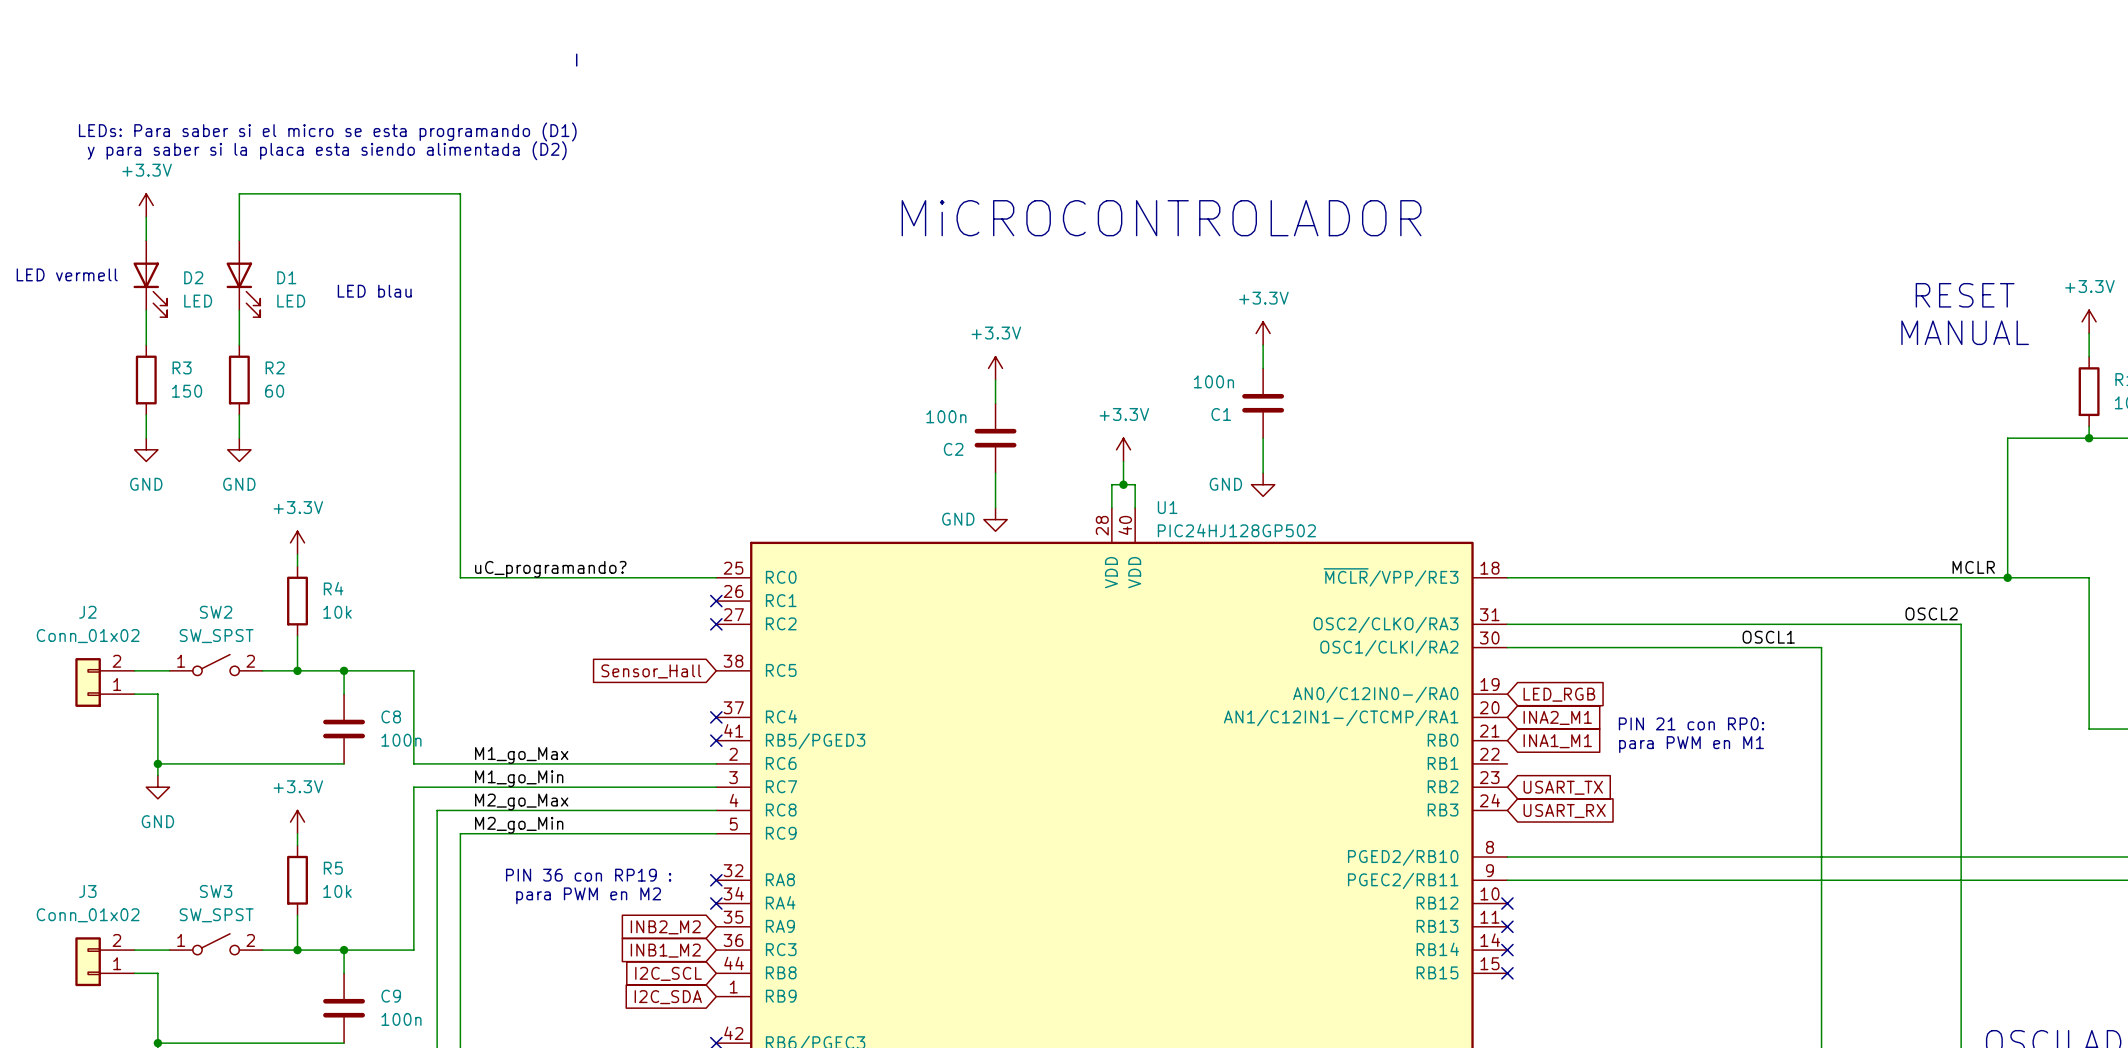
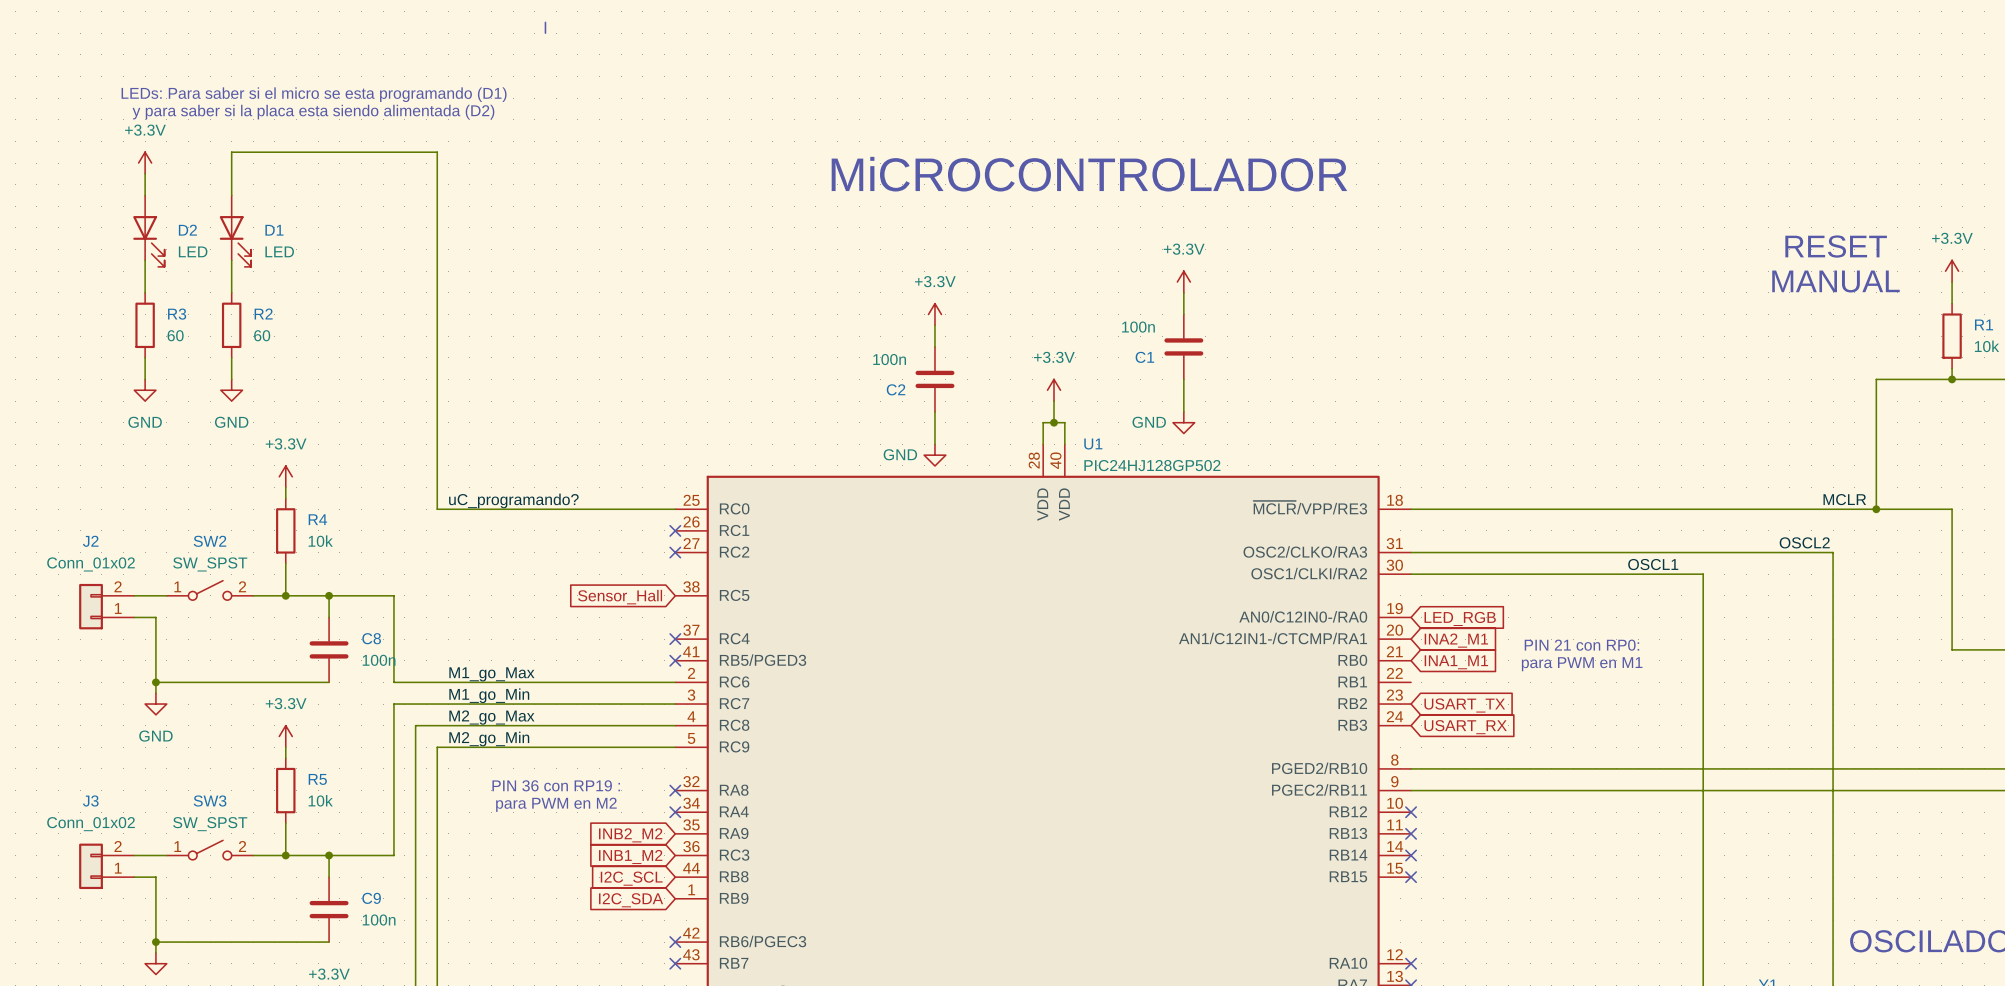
text: LED vermell (67, 274) -> none
text: LED blau (374, 291) -> none
R3 value: 150 (187, 391) -> 60 (175, 335)

